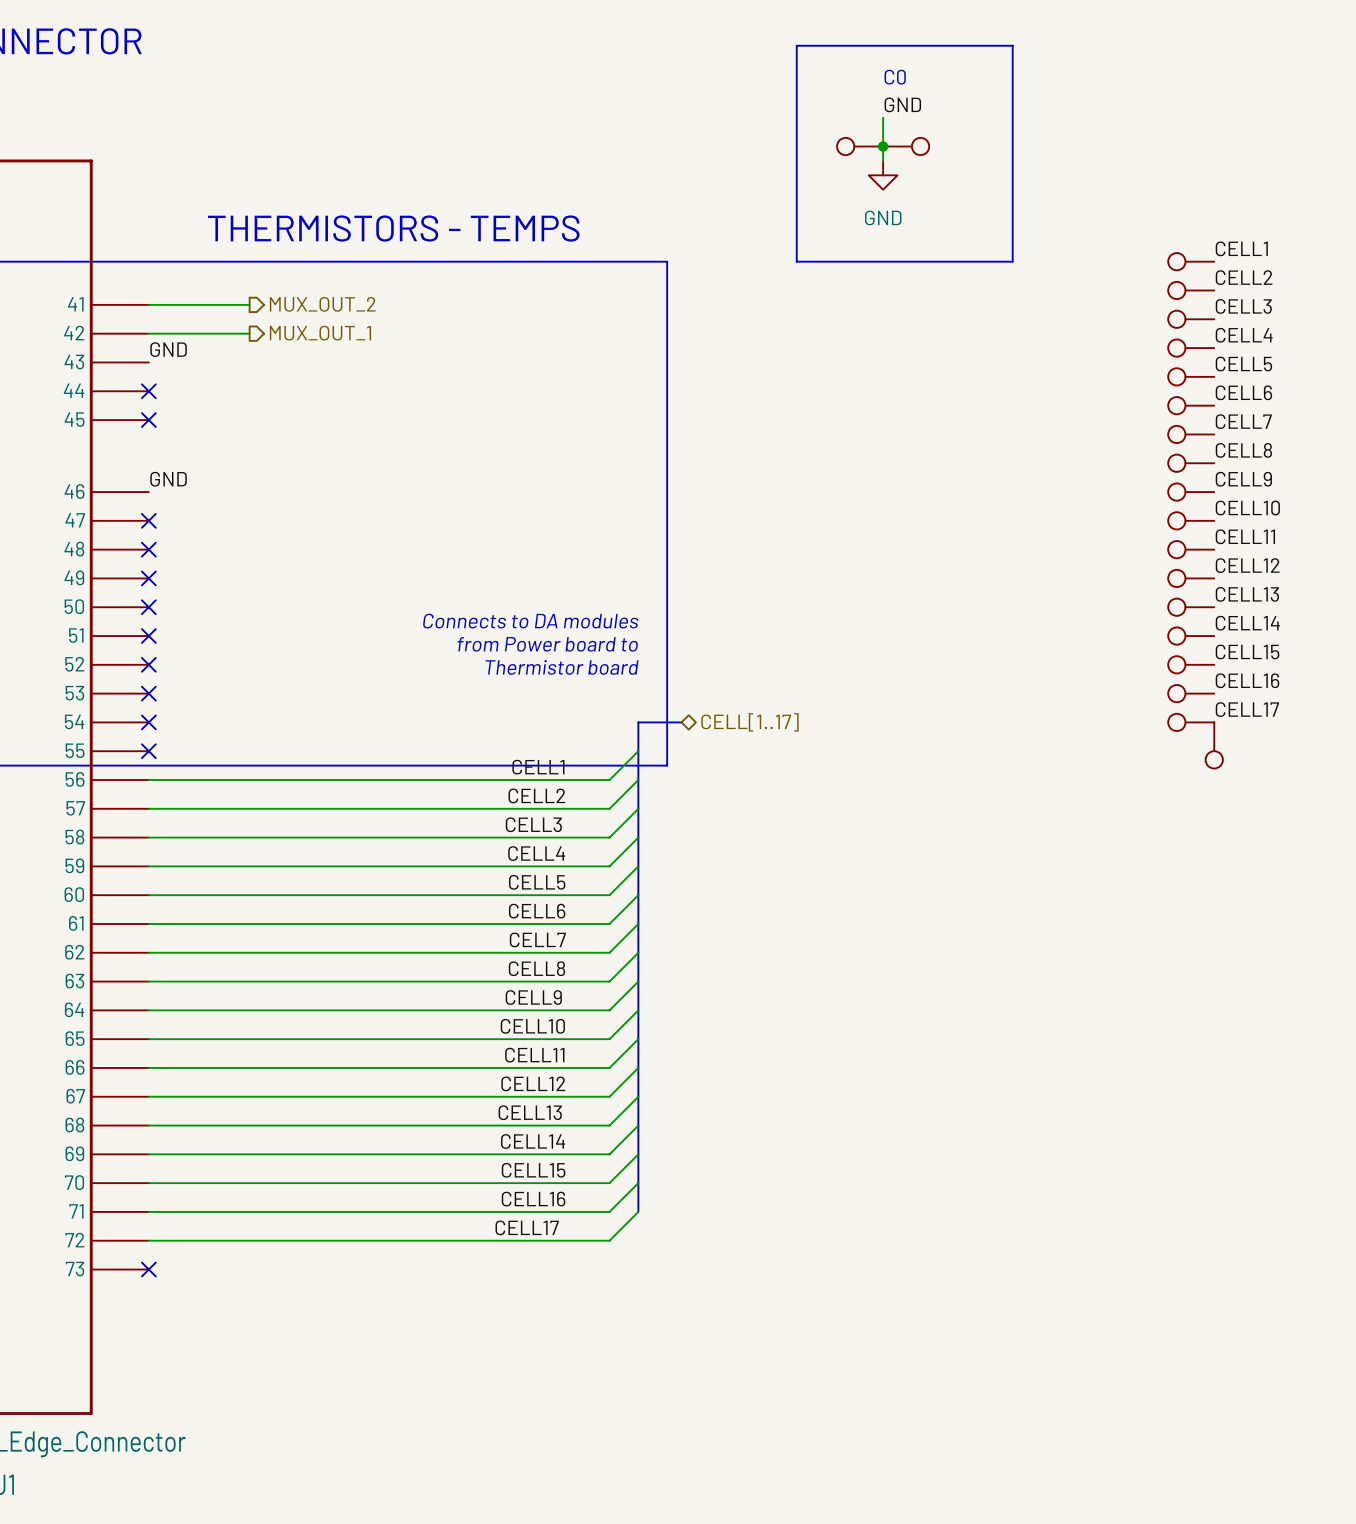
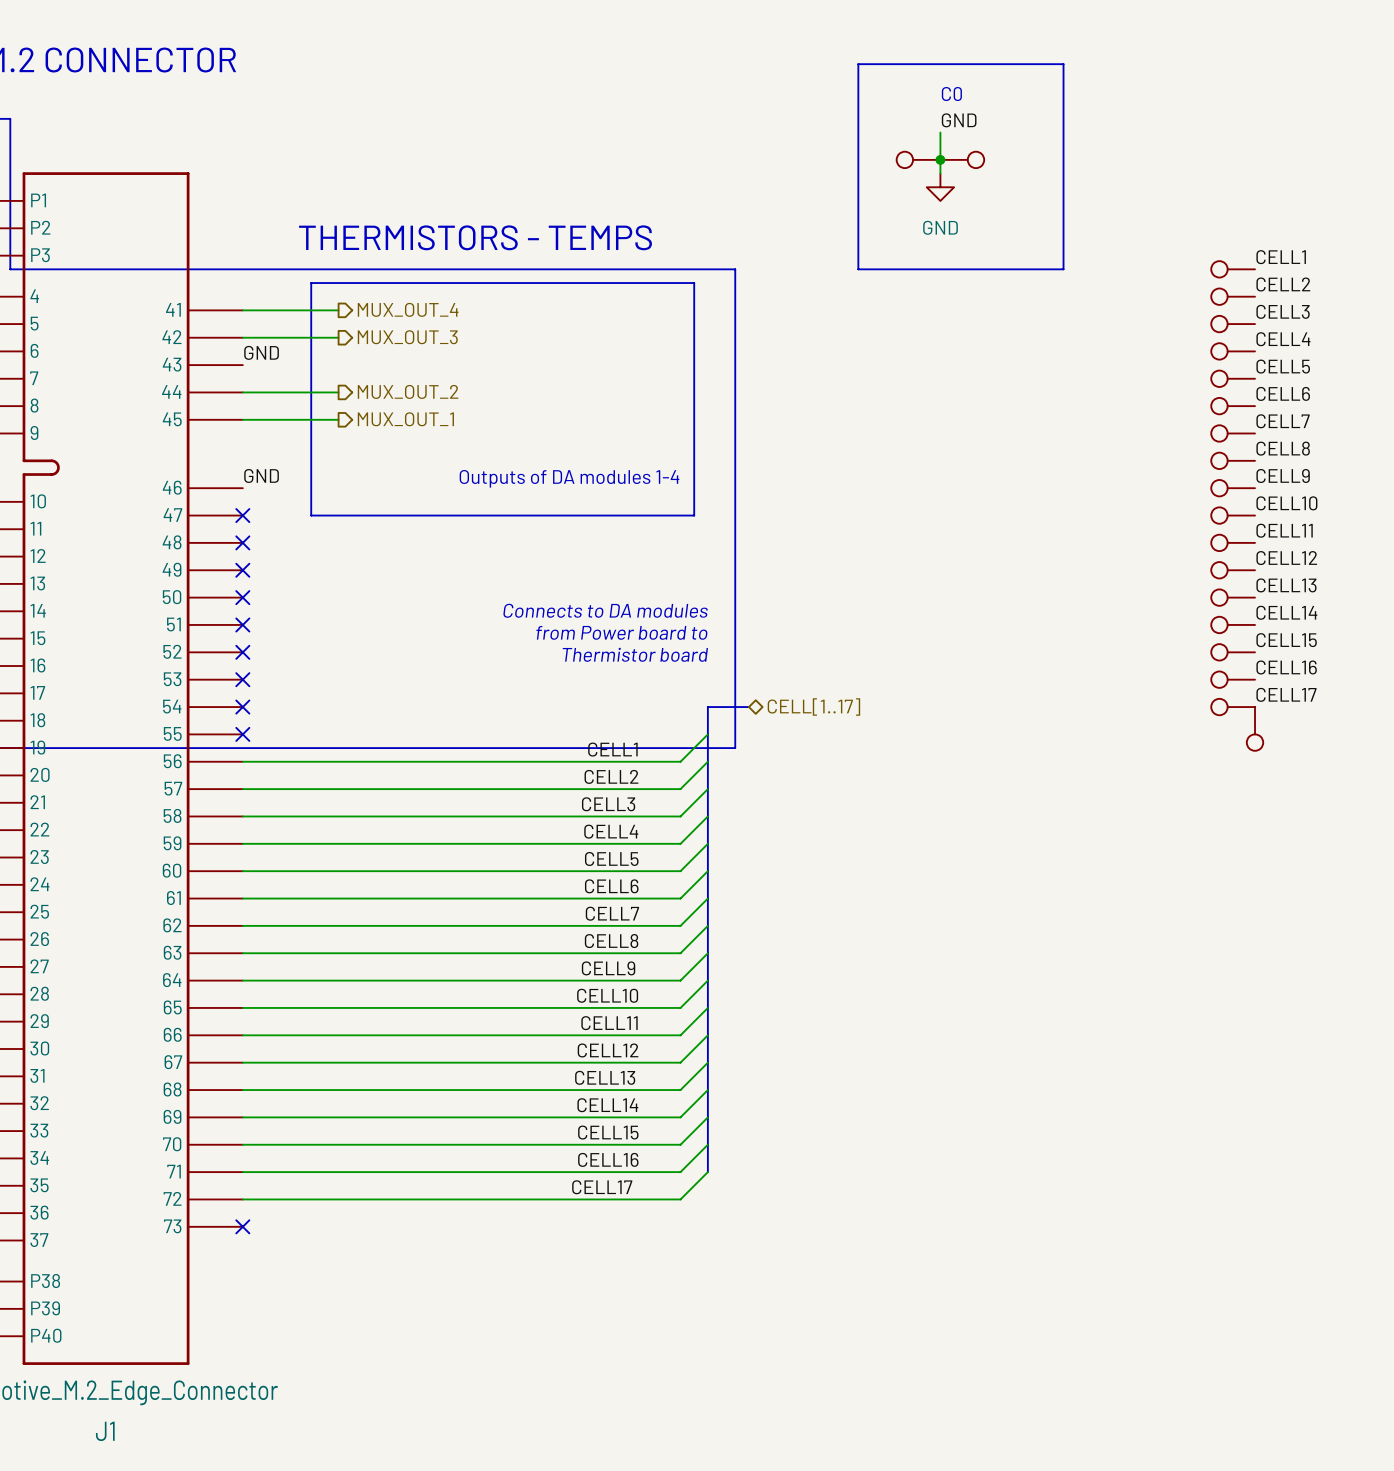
line: none -> (311, 283) (311, 515) (694, 515) (694, 283) (311, 283)
hierarchical label: MUX_OUT_2 (322, 304) -> MUX_OUT_4 (408, 309)
hierarchical label: MUX_OUT_1 (320, 333) -> MUX_OUT_3 (407, 337)
hierarchical label: none -> MUX_OUT_2 (408, 391)
wire: none -> (242, 392) (338, 392)
no-connect mark: (148, 391) -> none
hierarchical label: none -> MUX_OUT_1 (405, 419)
wire: none -> (242, 419) (338, 419)
no-connect mark: (148, 420) -> none
text: none -> Outputs of DA modules 1-4 (569, 478)

